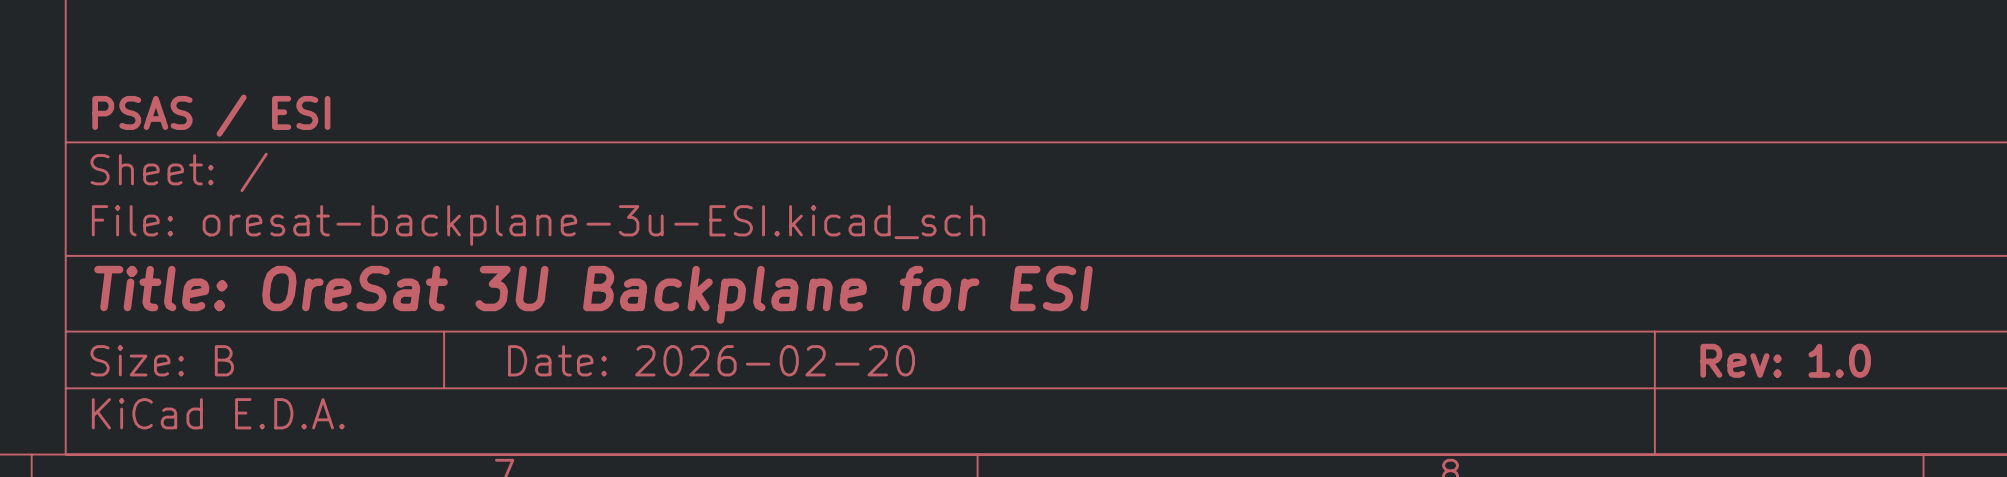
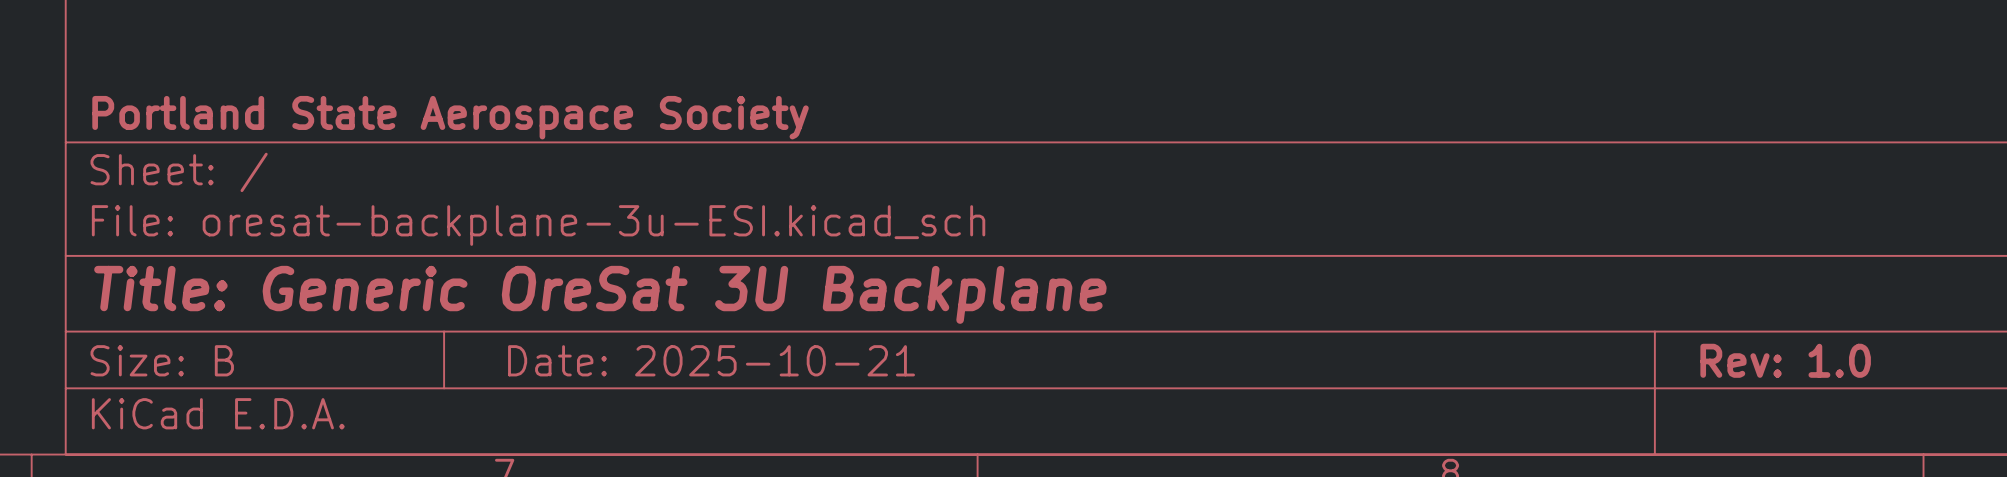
title block: PSAS / ESI (211, 115) -> Portland State Aerospace Society (450, 117)
title block: Title: OreSat 3U Backplane for ESI (593, 294) -> Title: Generic OreSat 3U Backplane (600, 294)
title block: Date: 2026-02-20 (711, 360) -> Date: 2025-10-21 (711, 360)

